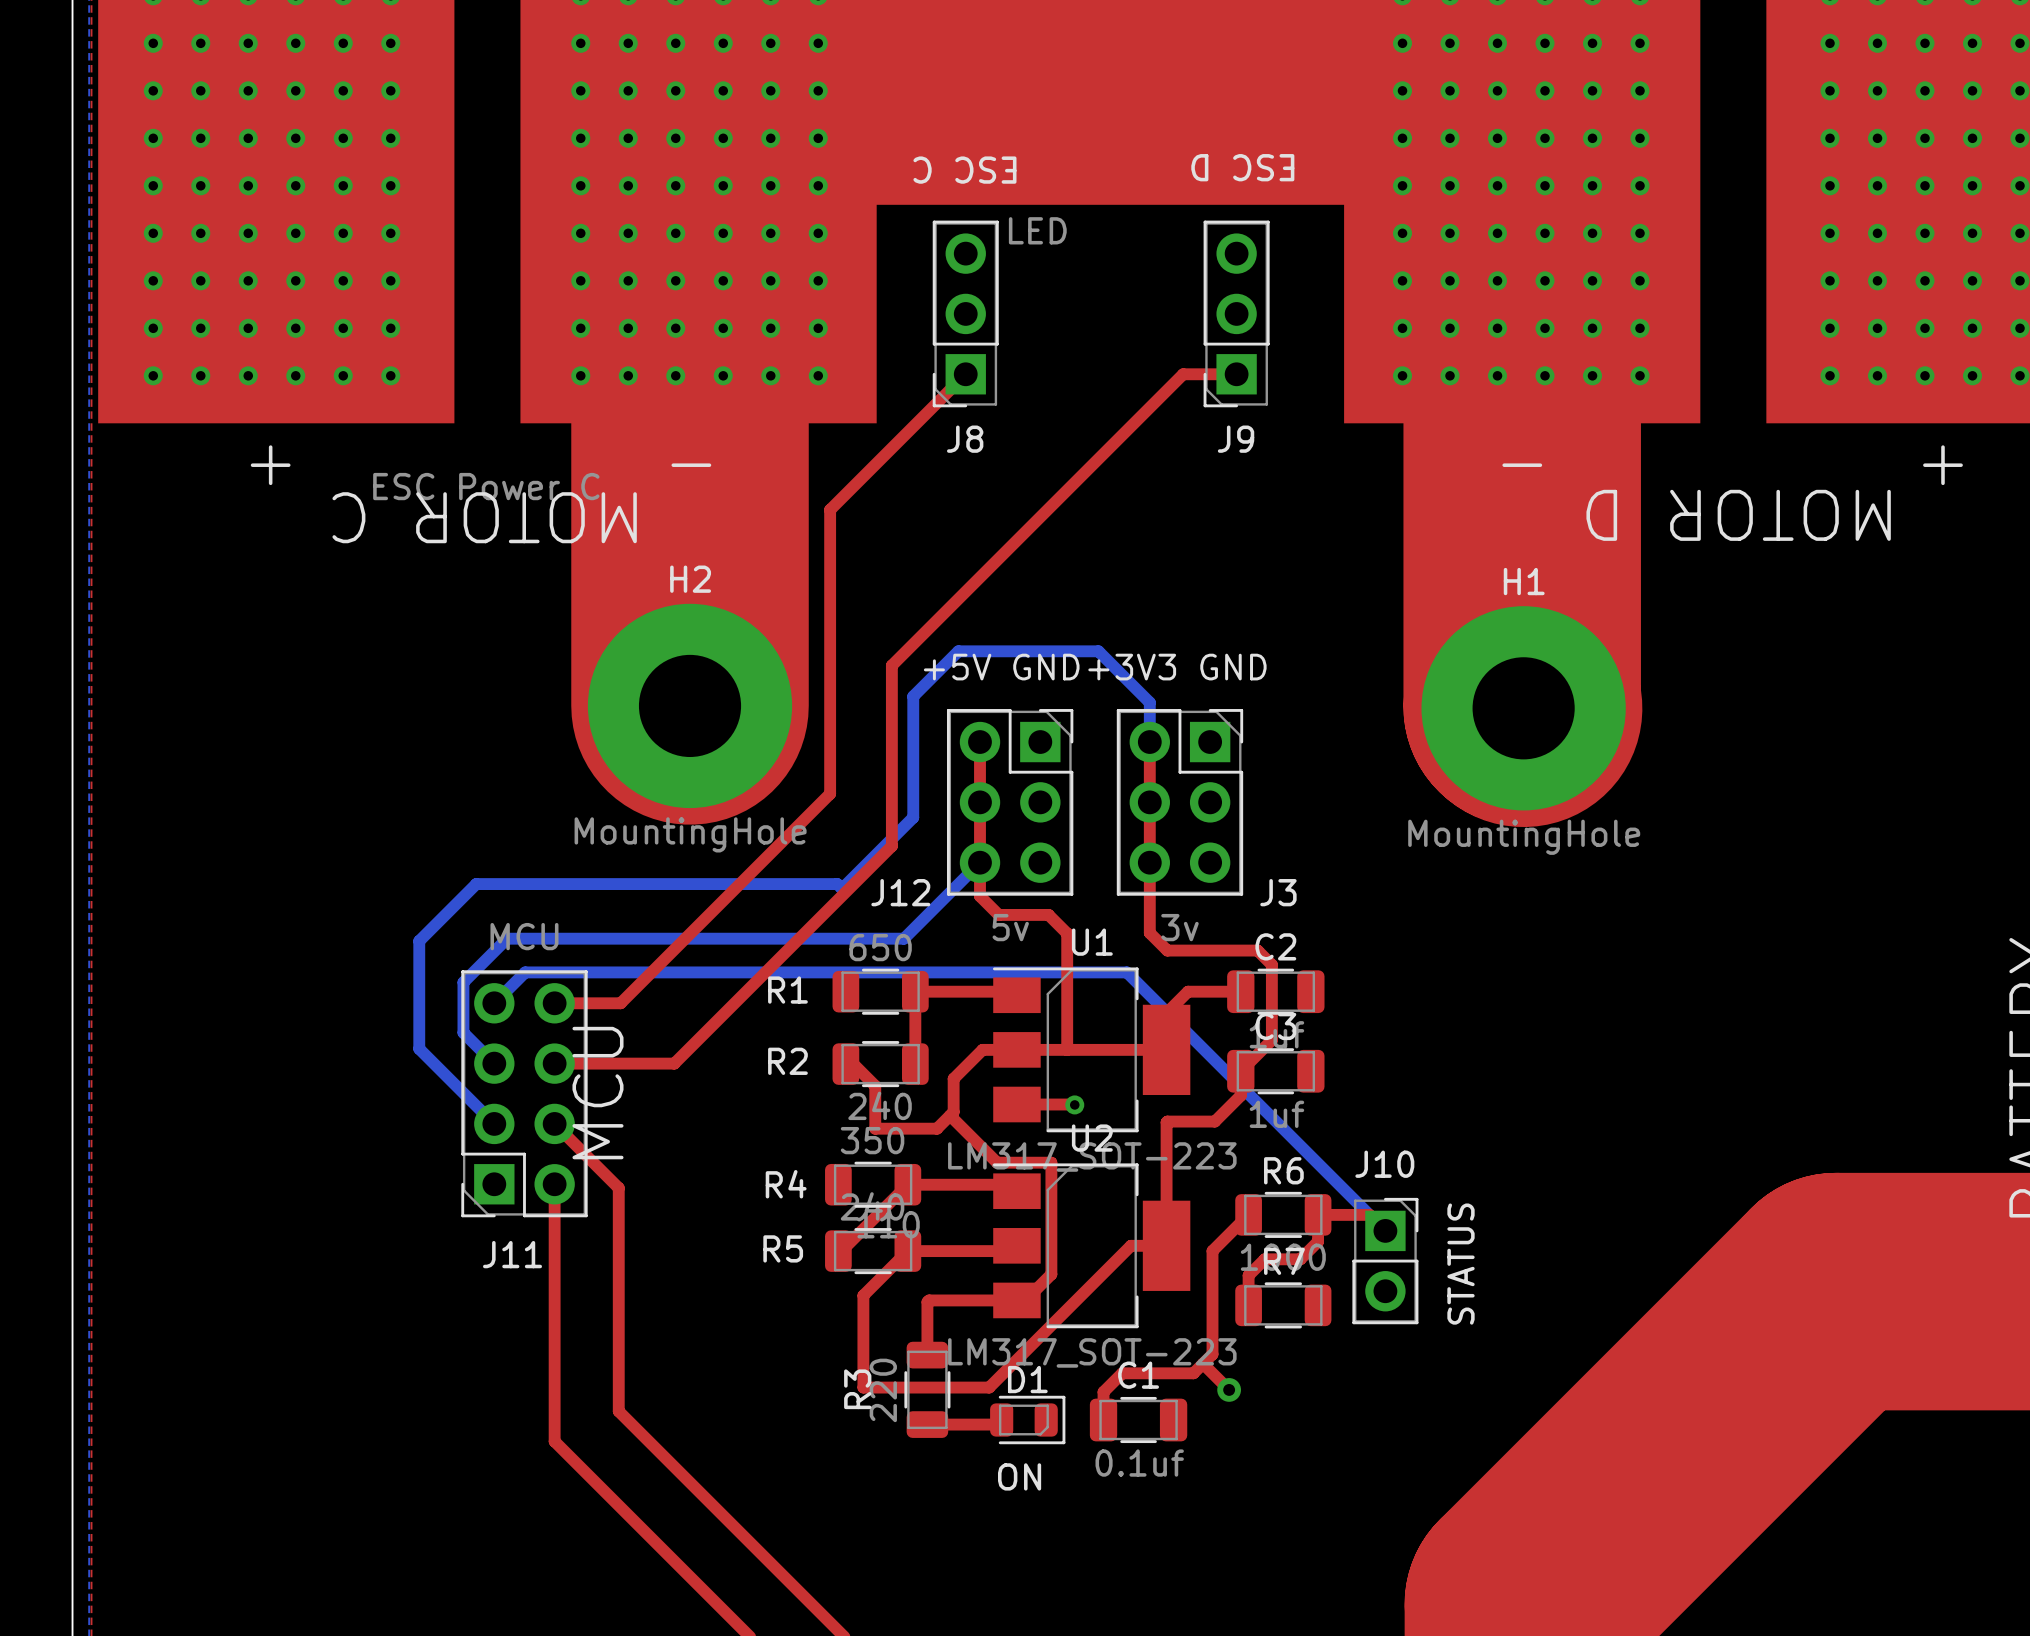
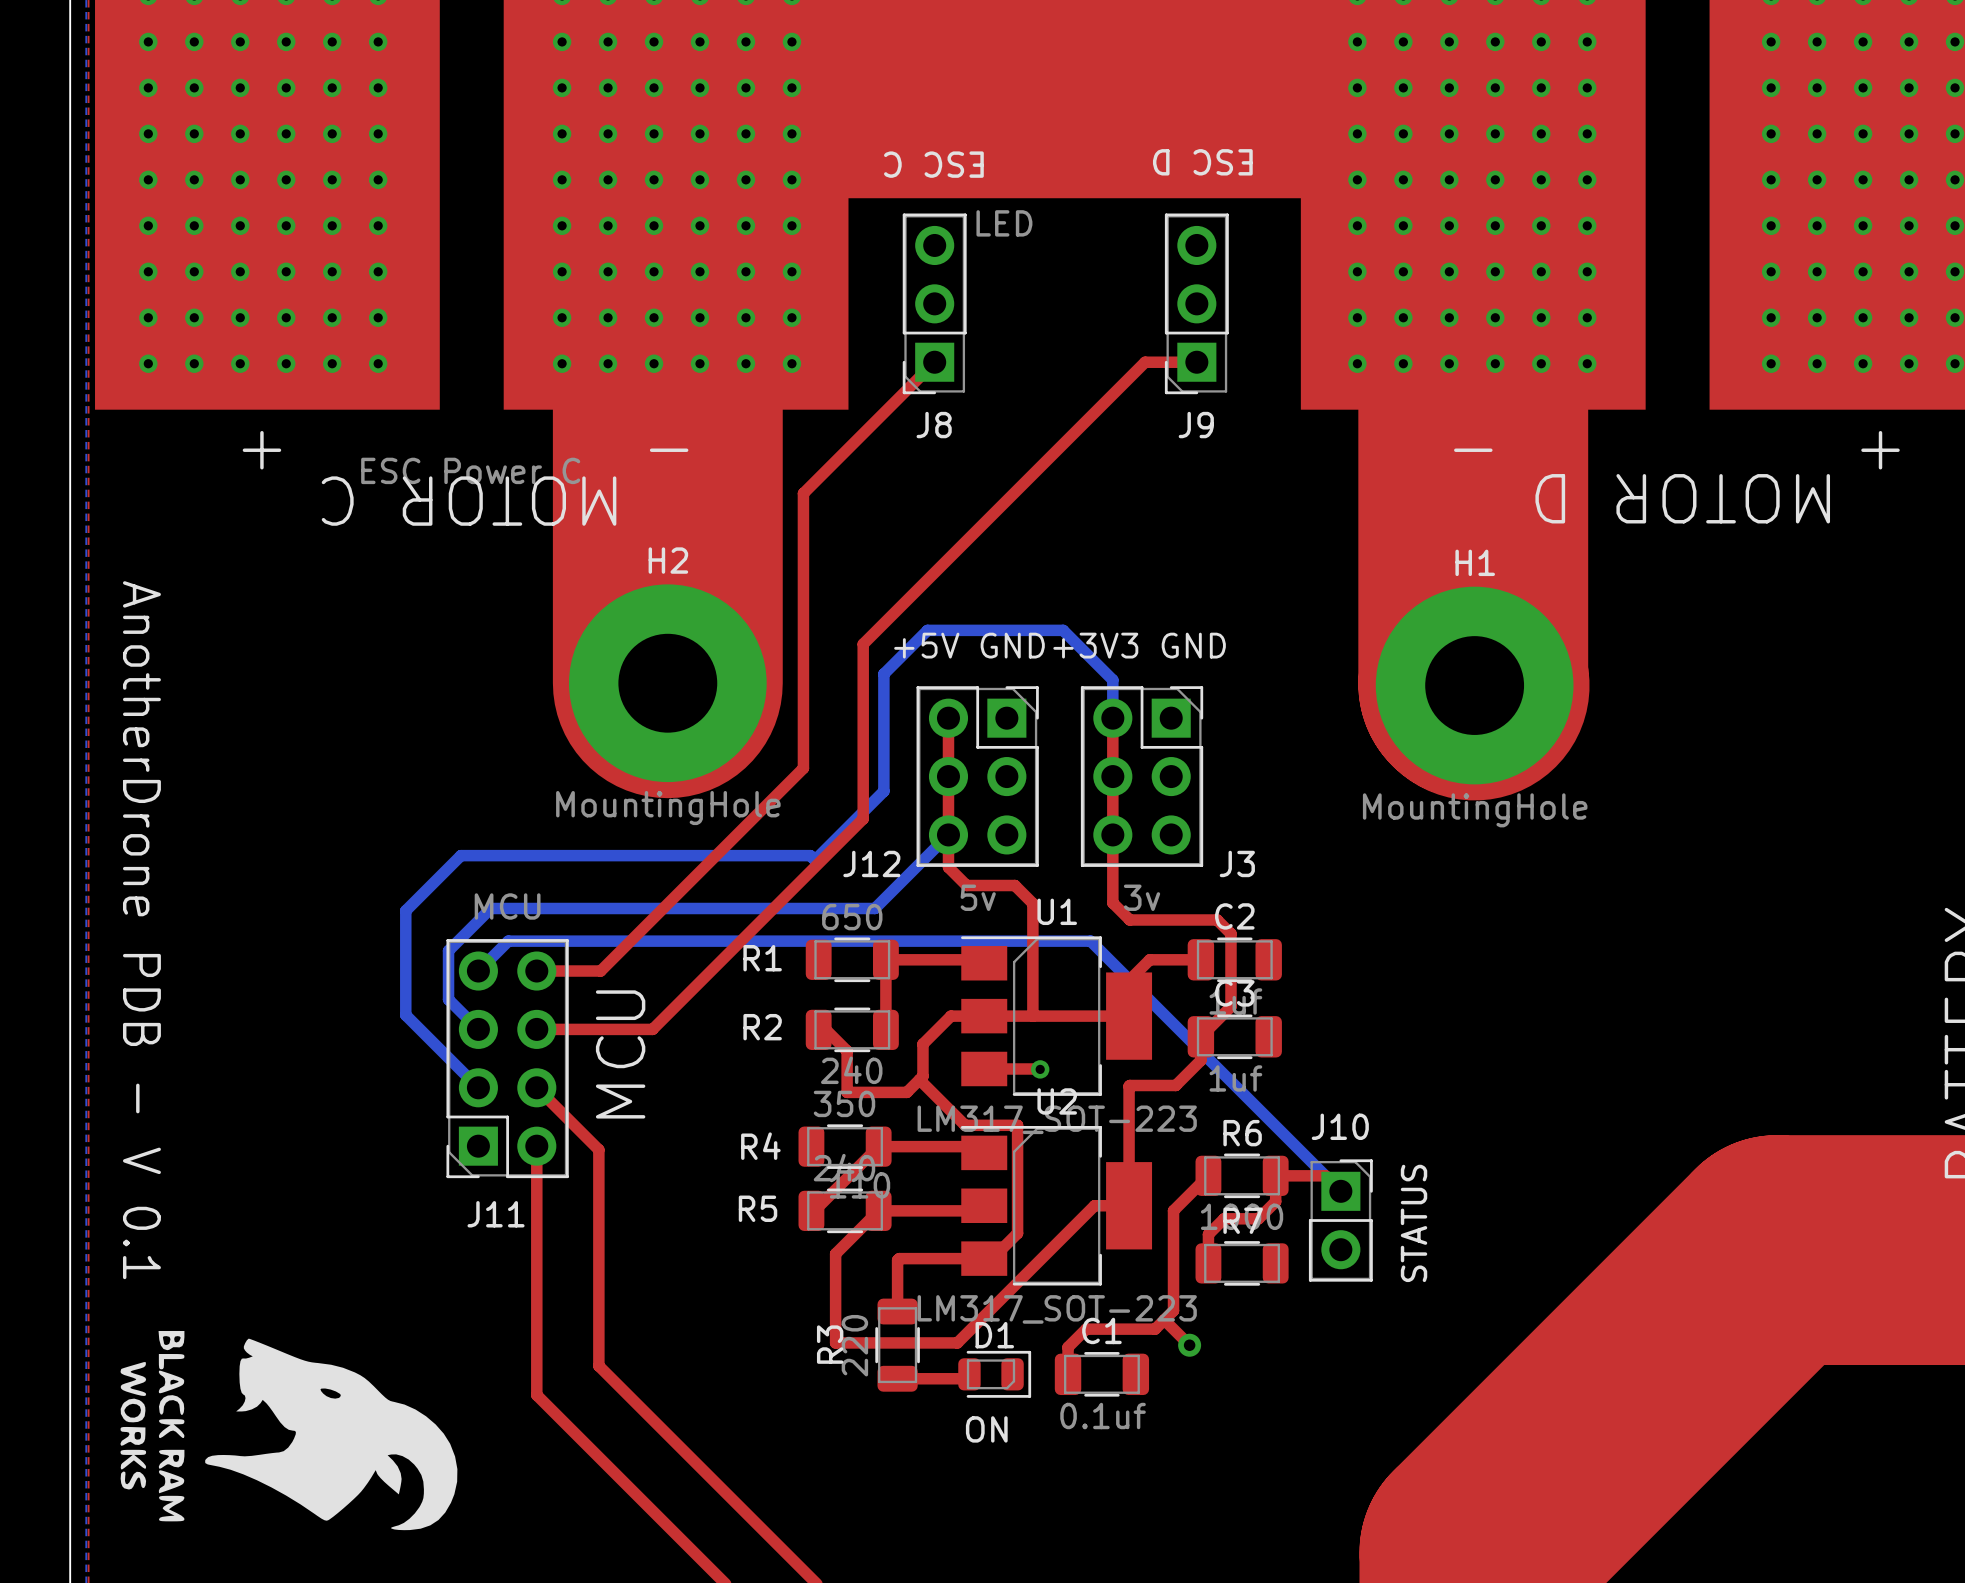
text: none -> AnotherDrone PDB - V 0.1 (141, 930)
text position: MCU (597, 1093) -> MCU (620, 1054)
drawing: none -> [120, 1331, 458, 1531]

